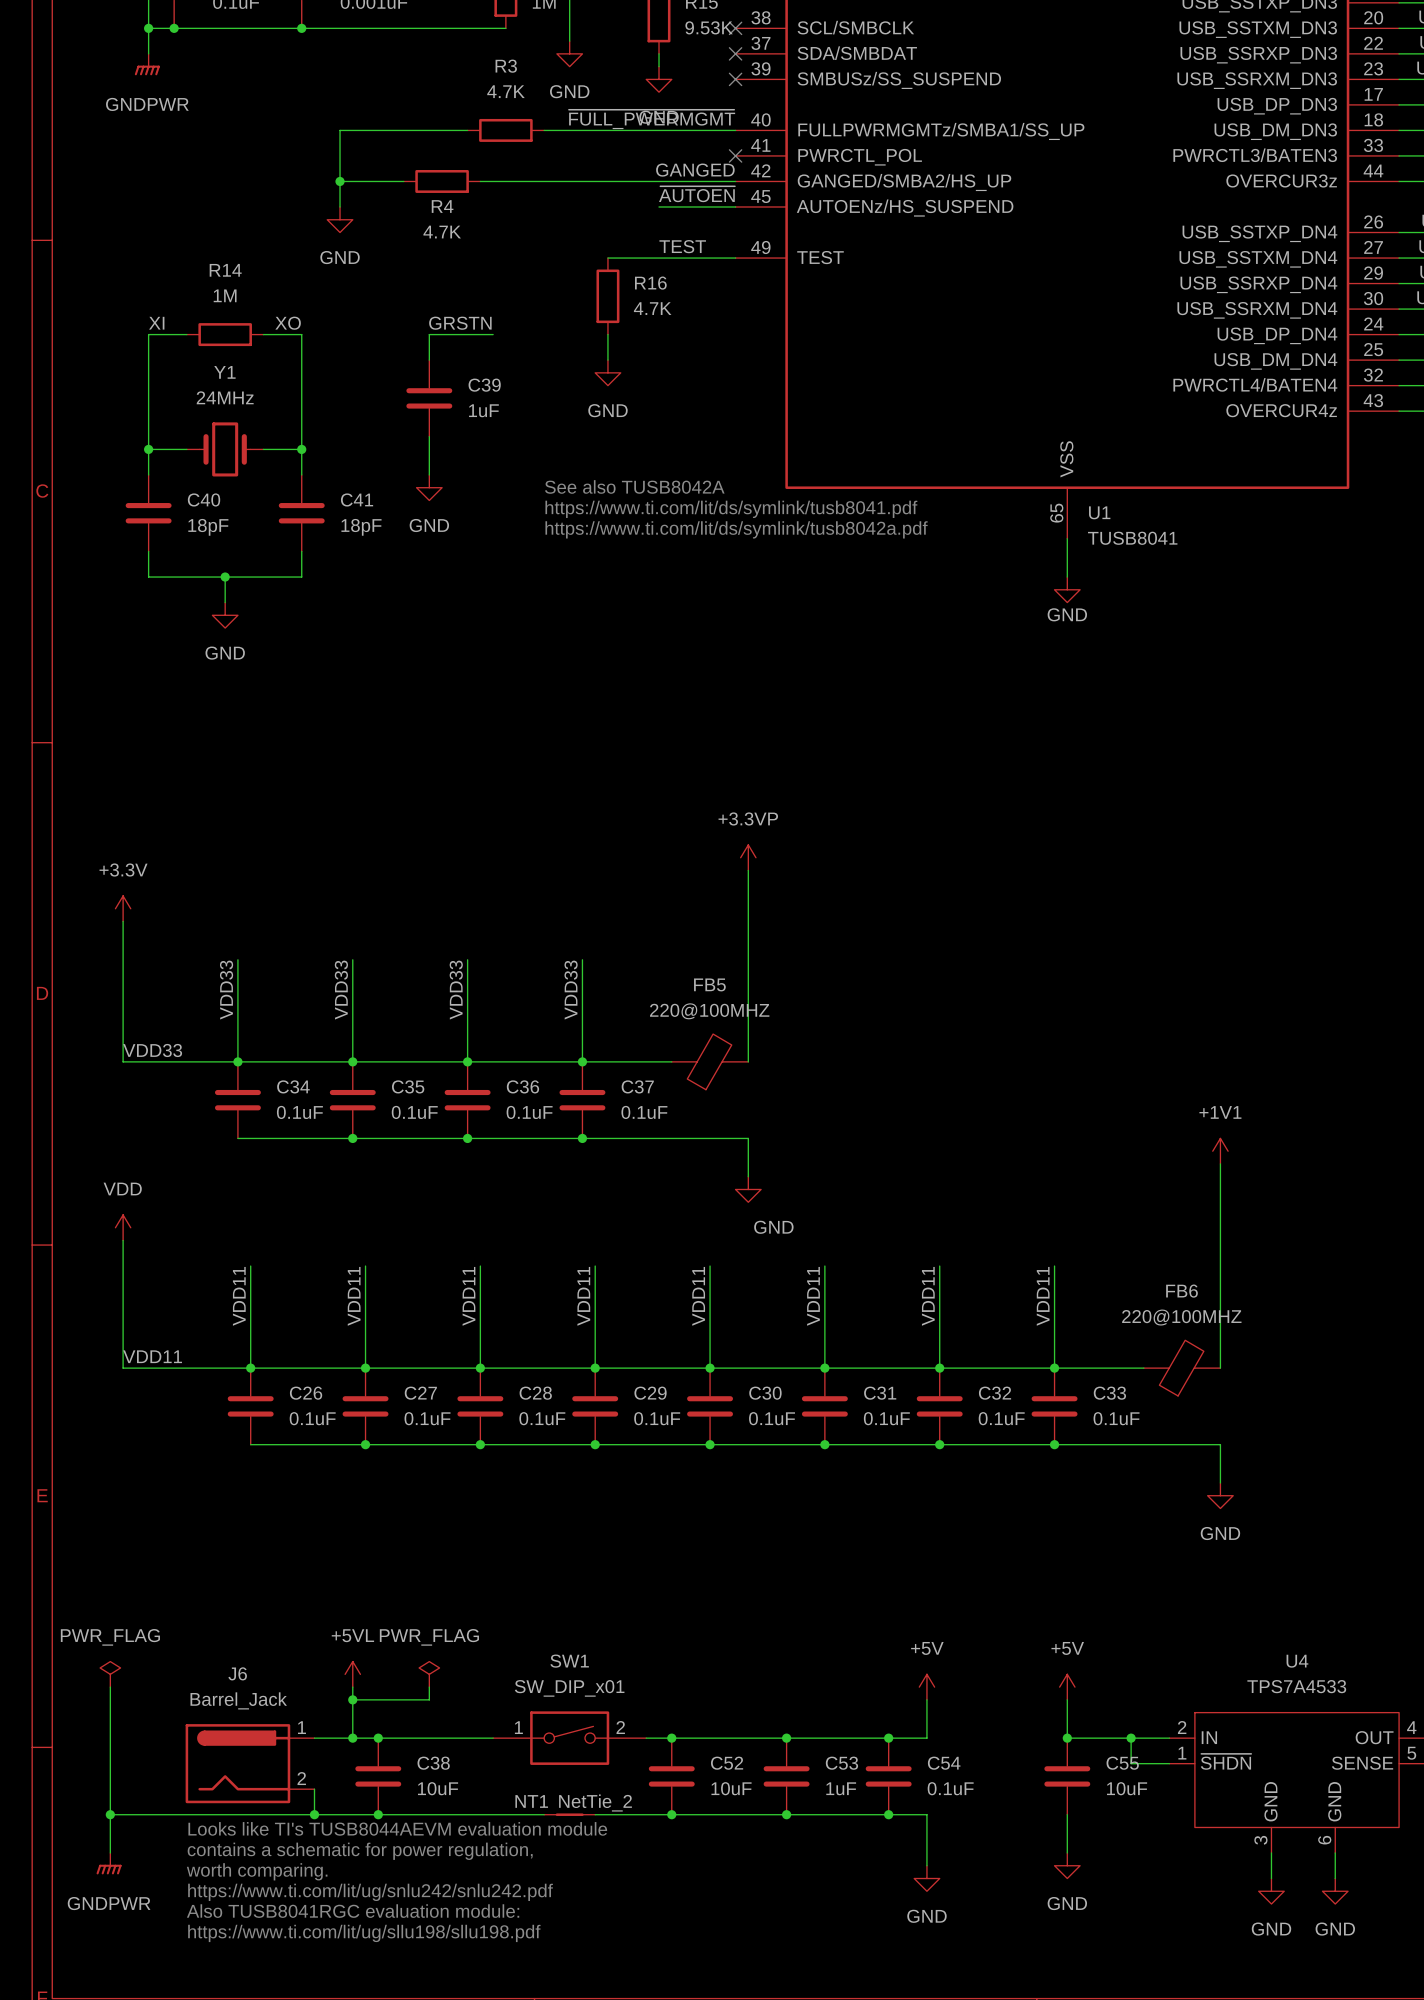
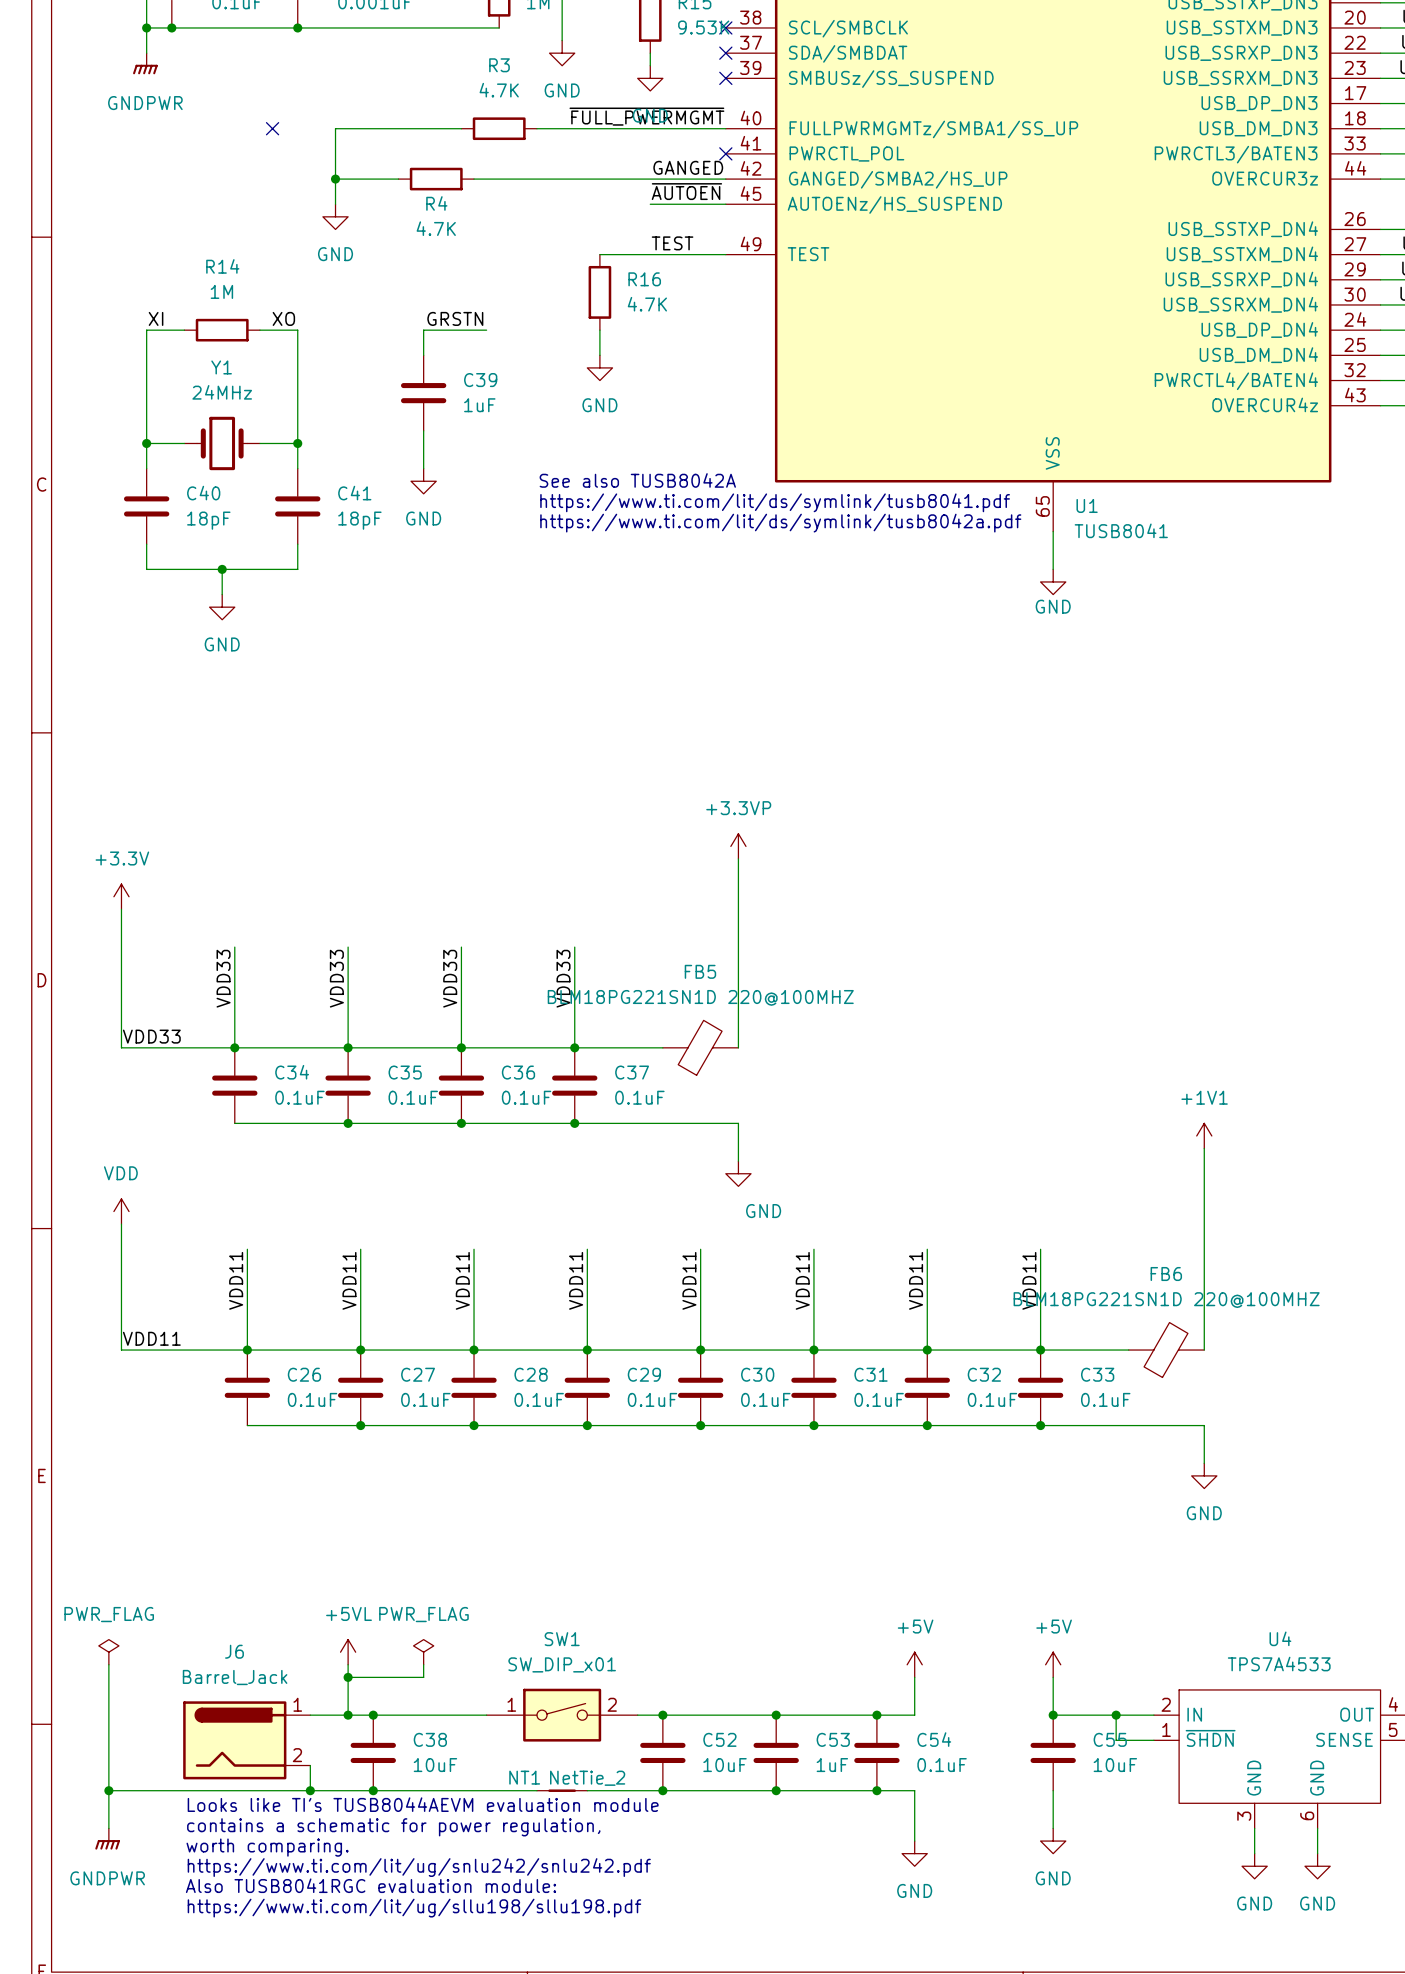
no-connect mark: none -> (272, 128)
FB5 value: 220@100MHZ (709, 1011) -> BLM18PG221SN1D 220@100MHZ (700, 997)
FB6 value: 220@100MHZ (1181, 1317) -> BLM18PG221SN1D 220@100MHZ (1166, 1300)

